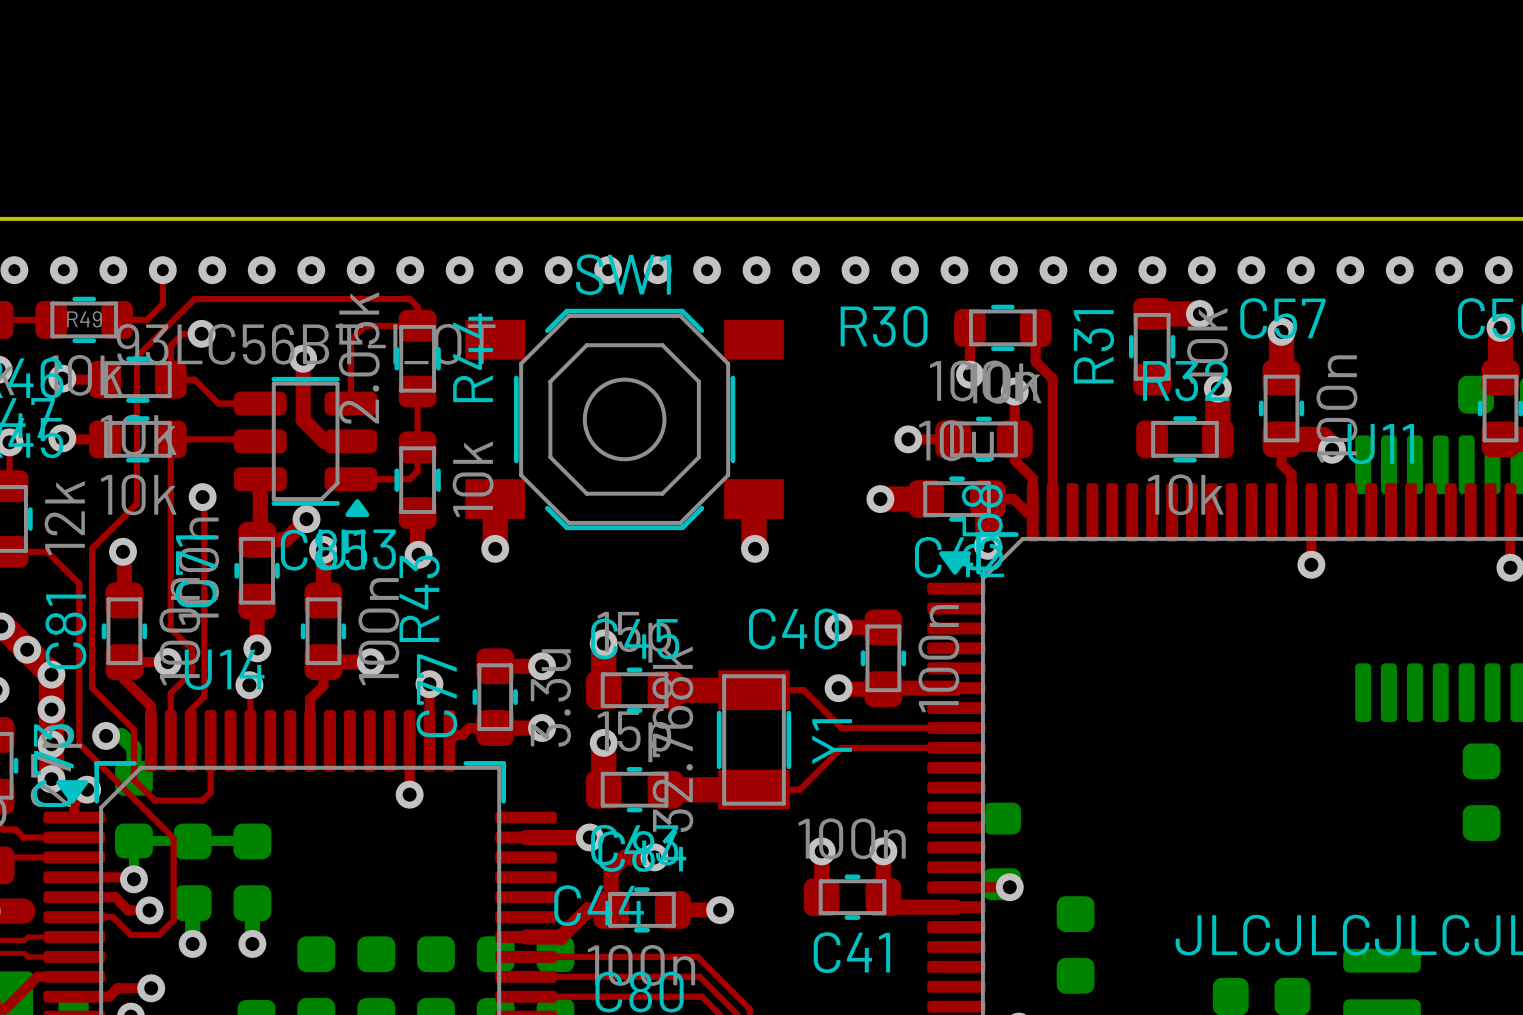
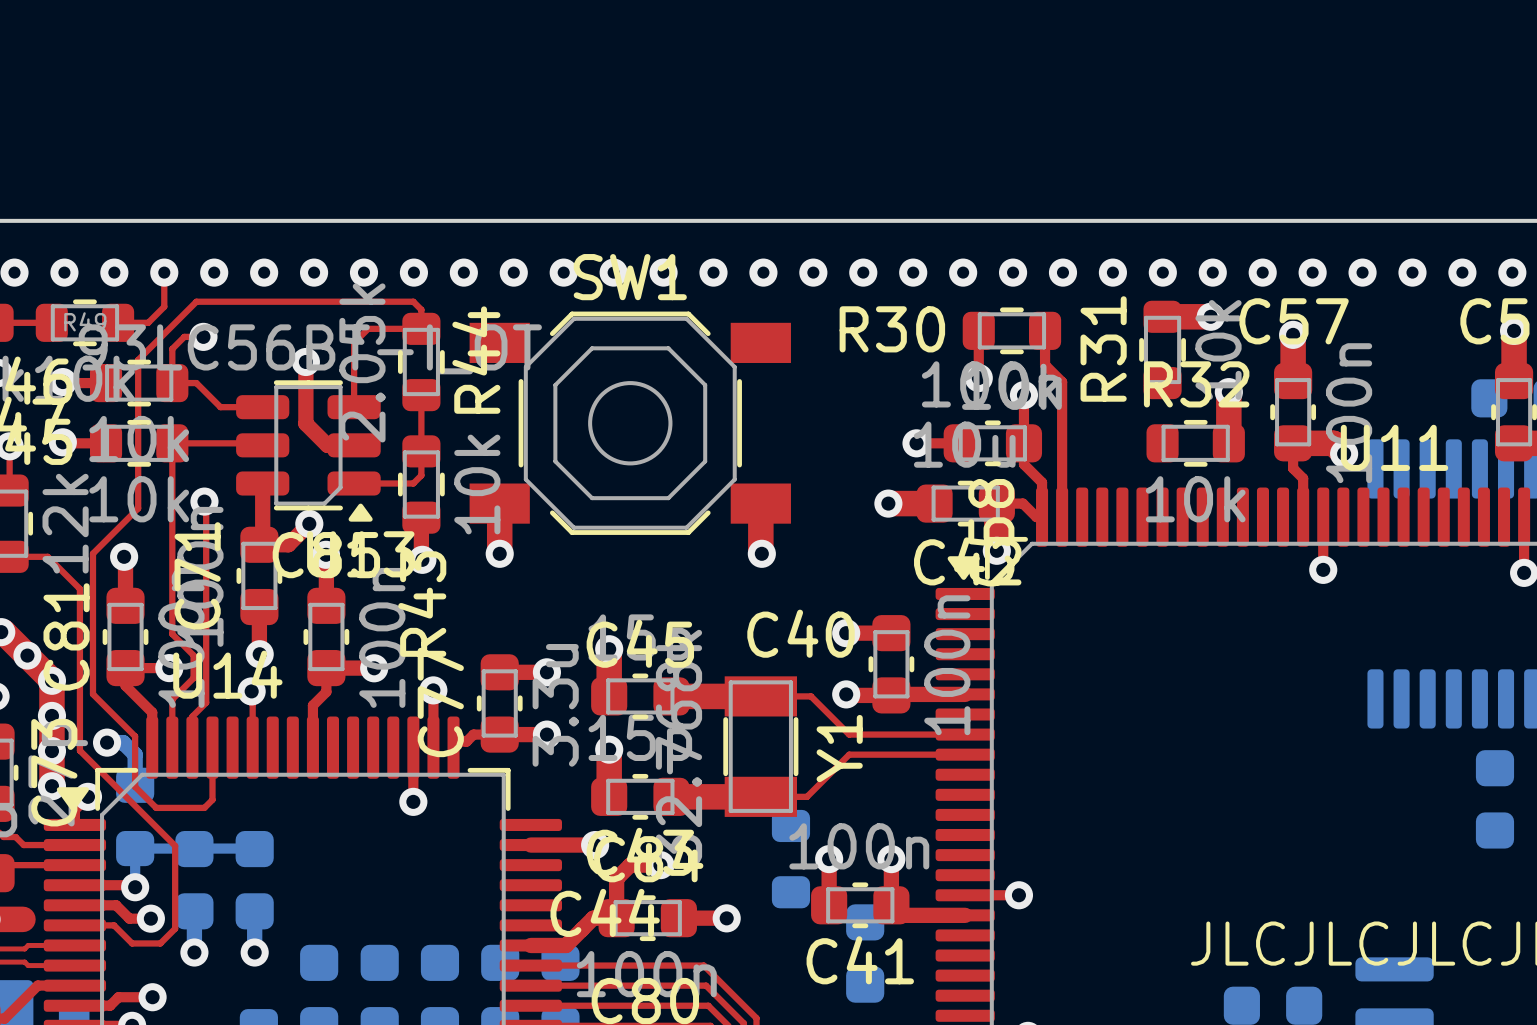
part position: (1002, 851) -> (790, 859)
part position: (1075, 944) -> (865, 953)

